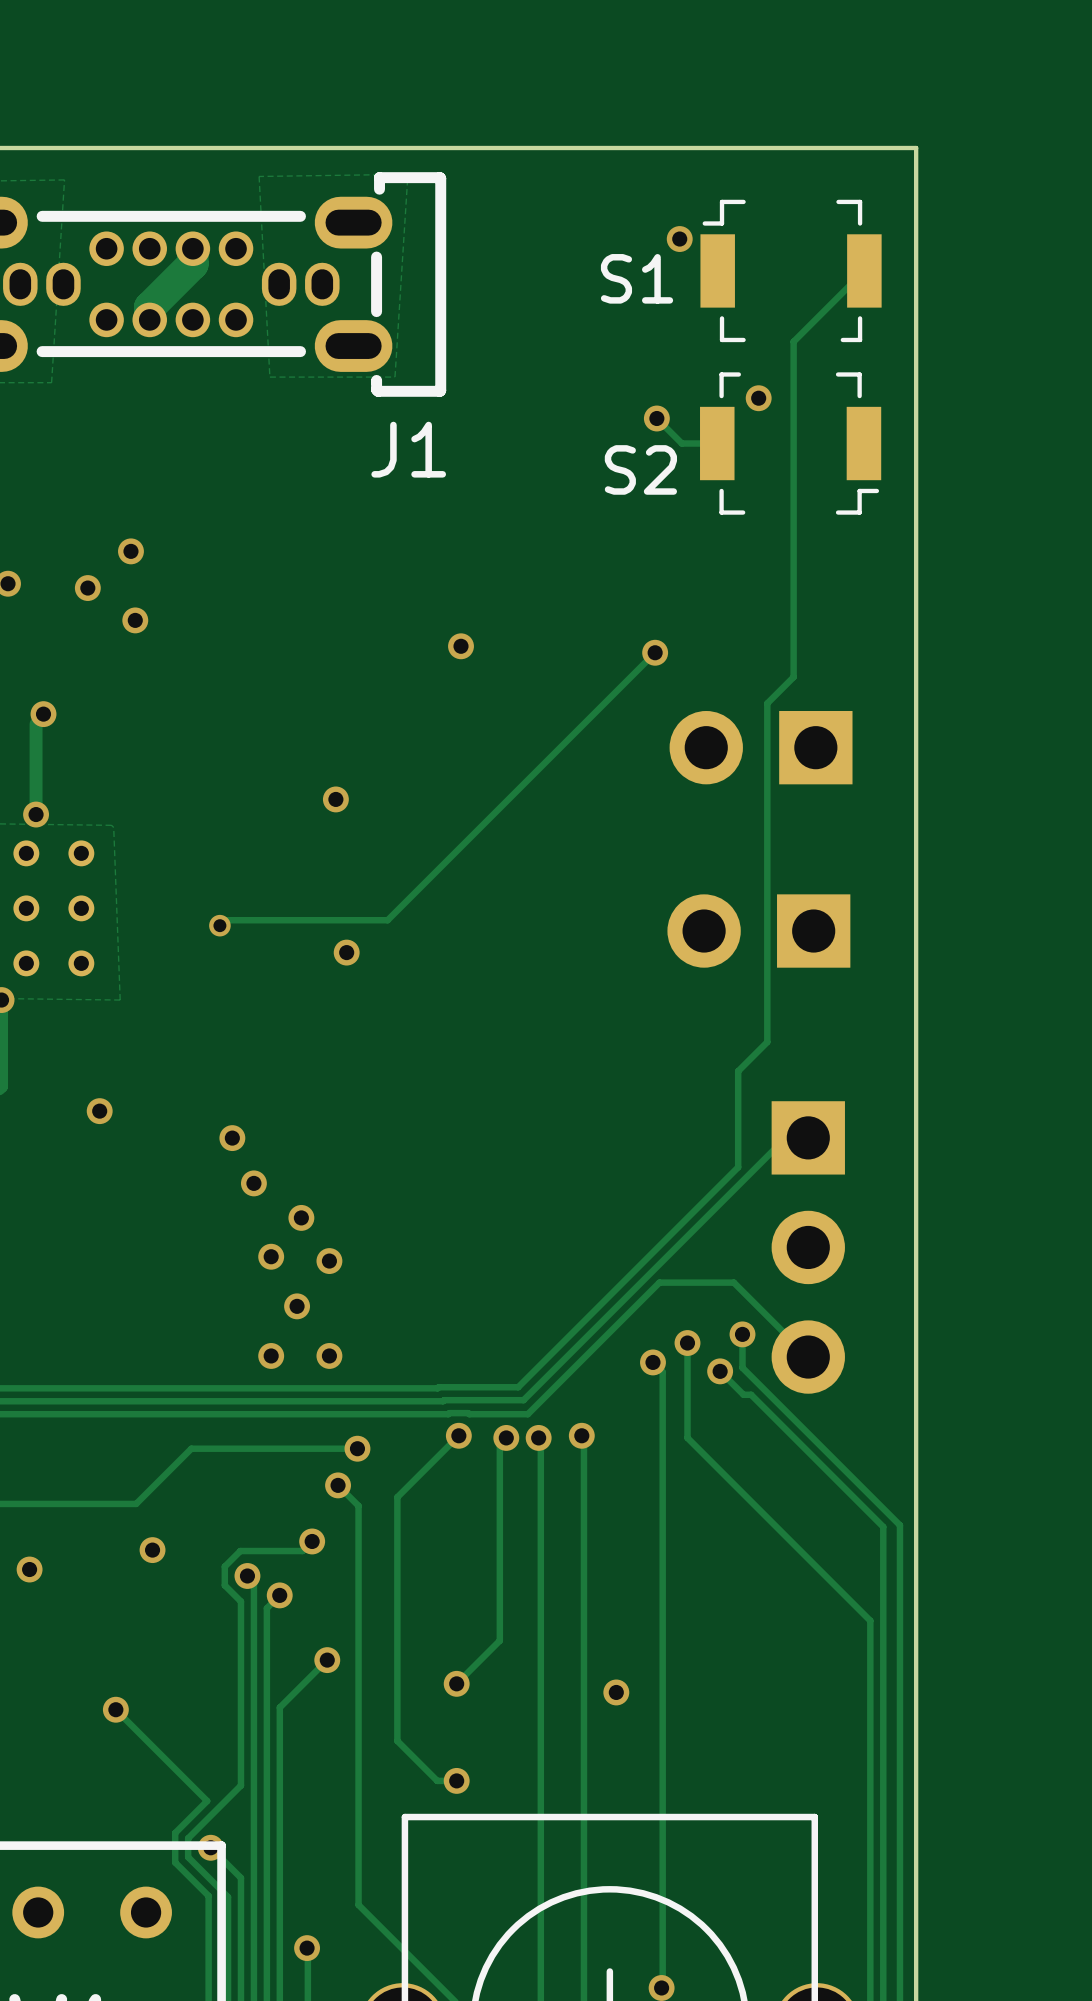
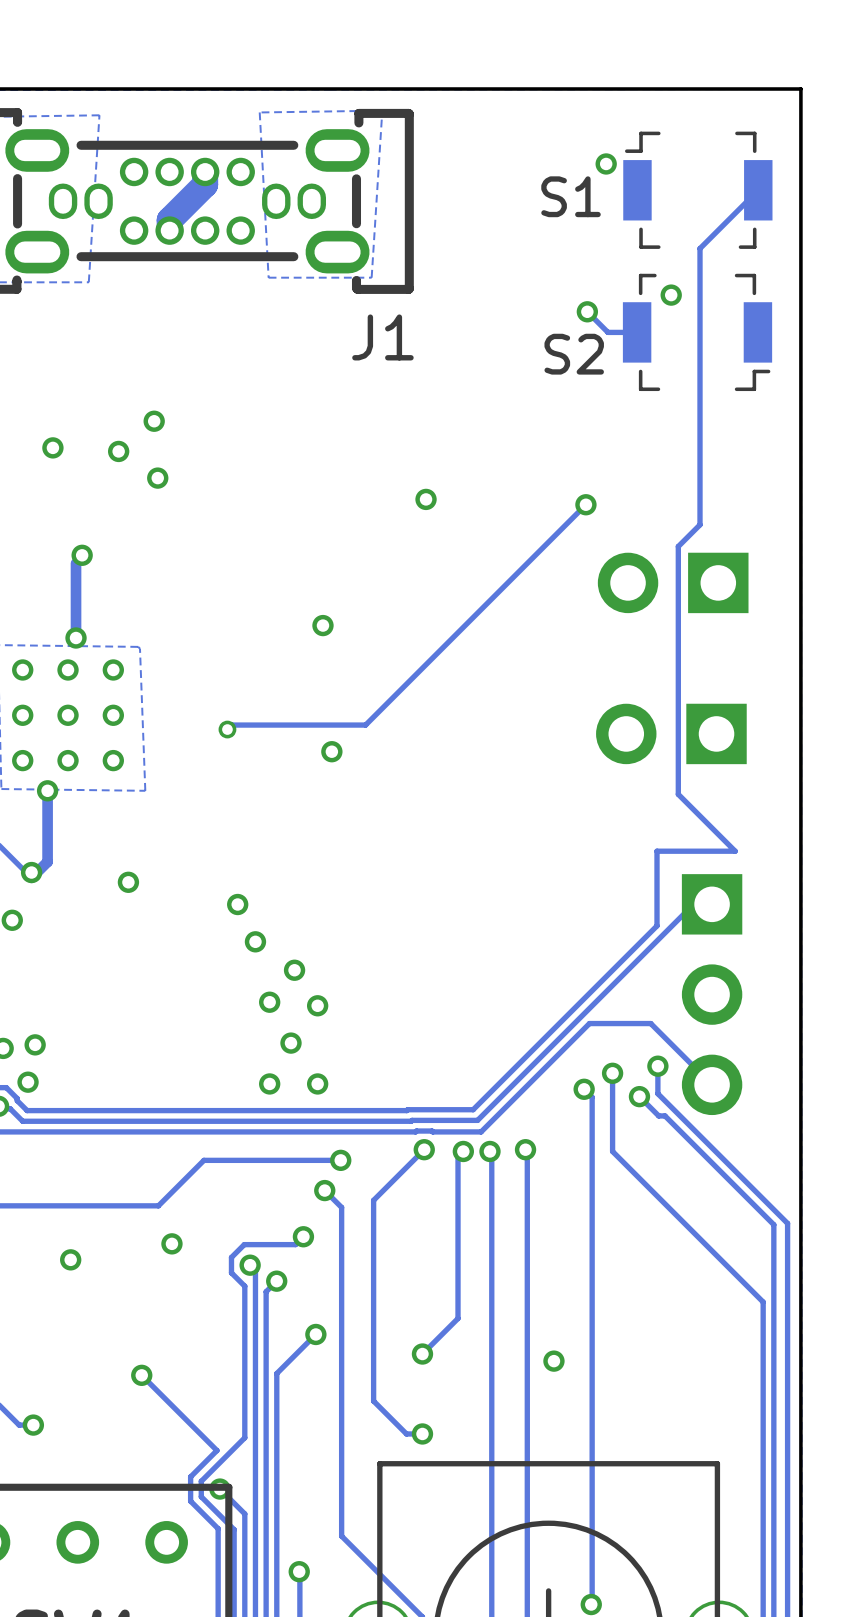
track: (767, 1004) (767, 1042) (738, 1071) (738, 1167) -> (678, 794) (735, 851) (657, 851) (657, 925) (654, 928)

